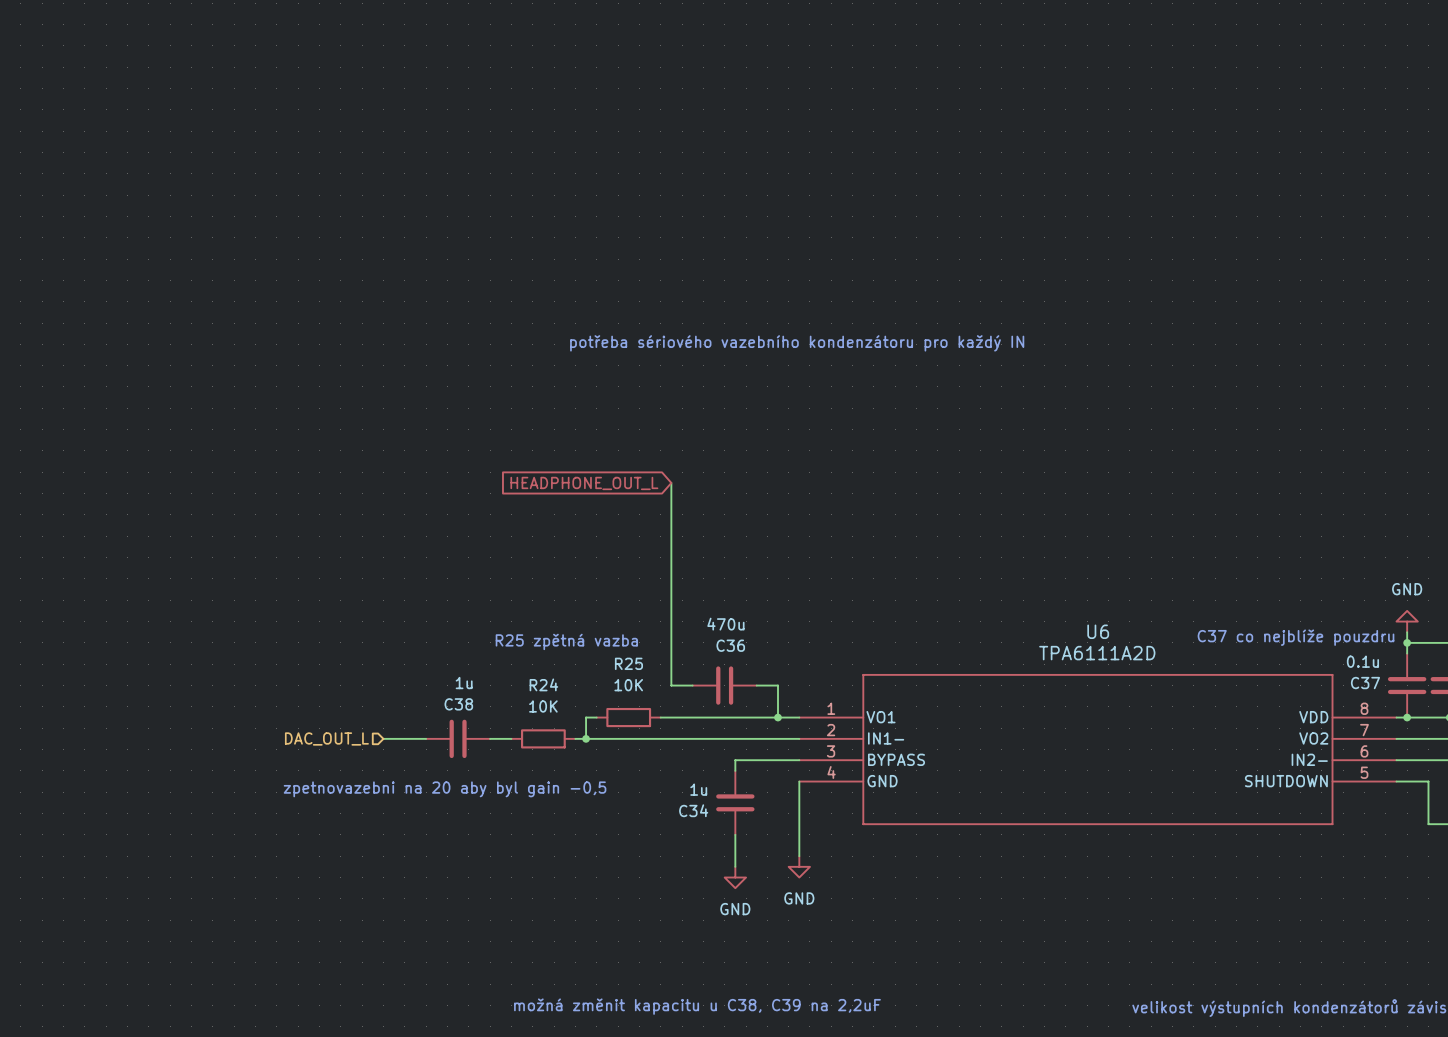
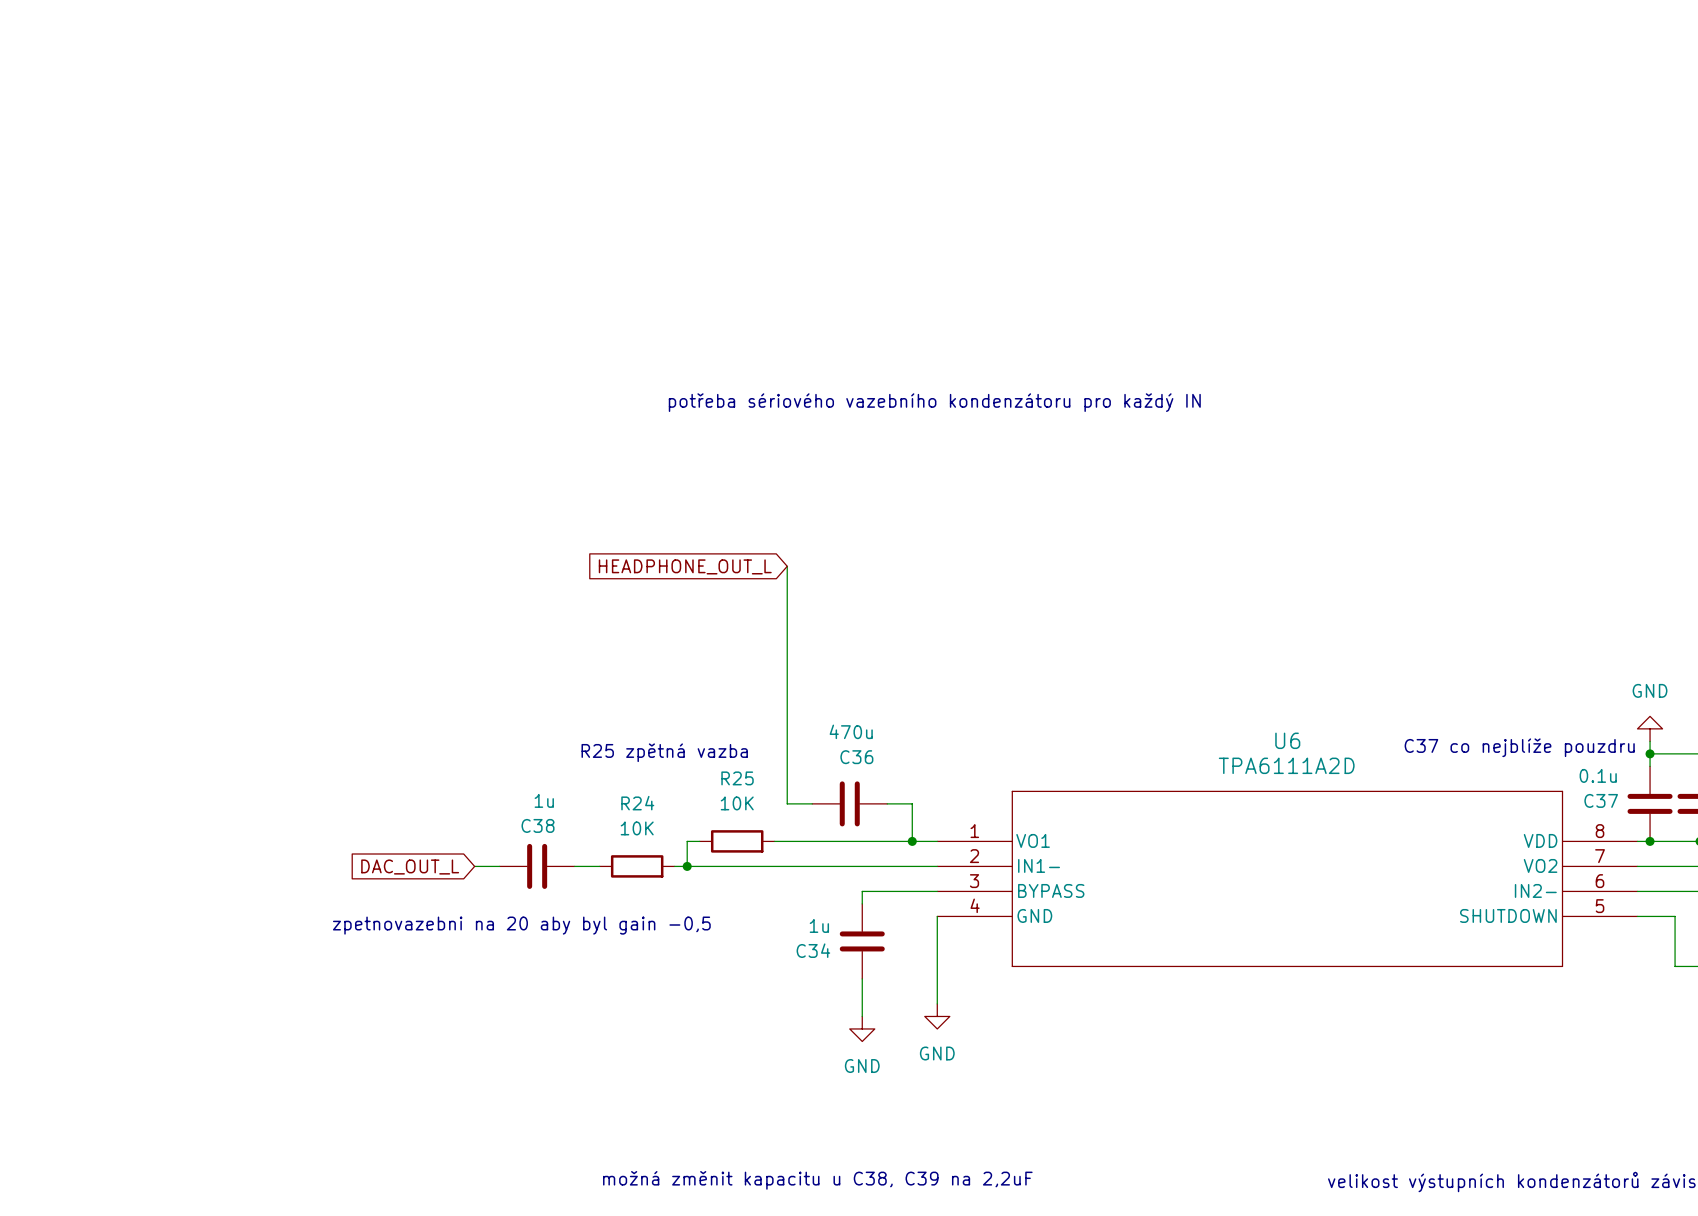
hierarchical label: DAC_OUT_L (326, 738) -> none
wire: (383, 738) (404, 738) -> none
global label: none -> DAC_OUT_L (410, 867)

